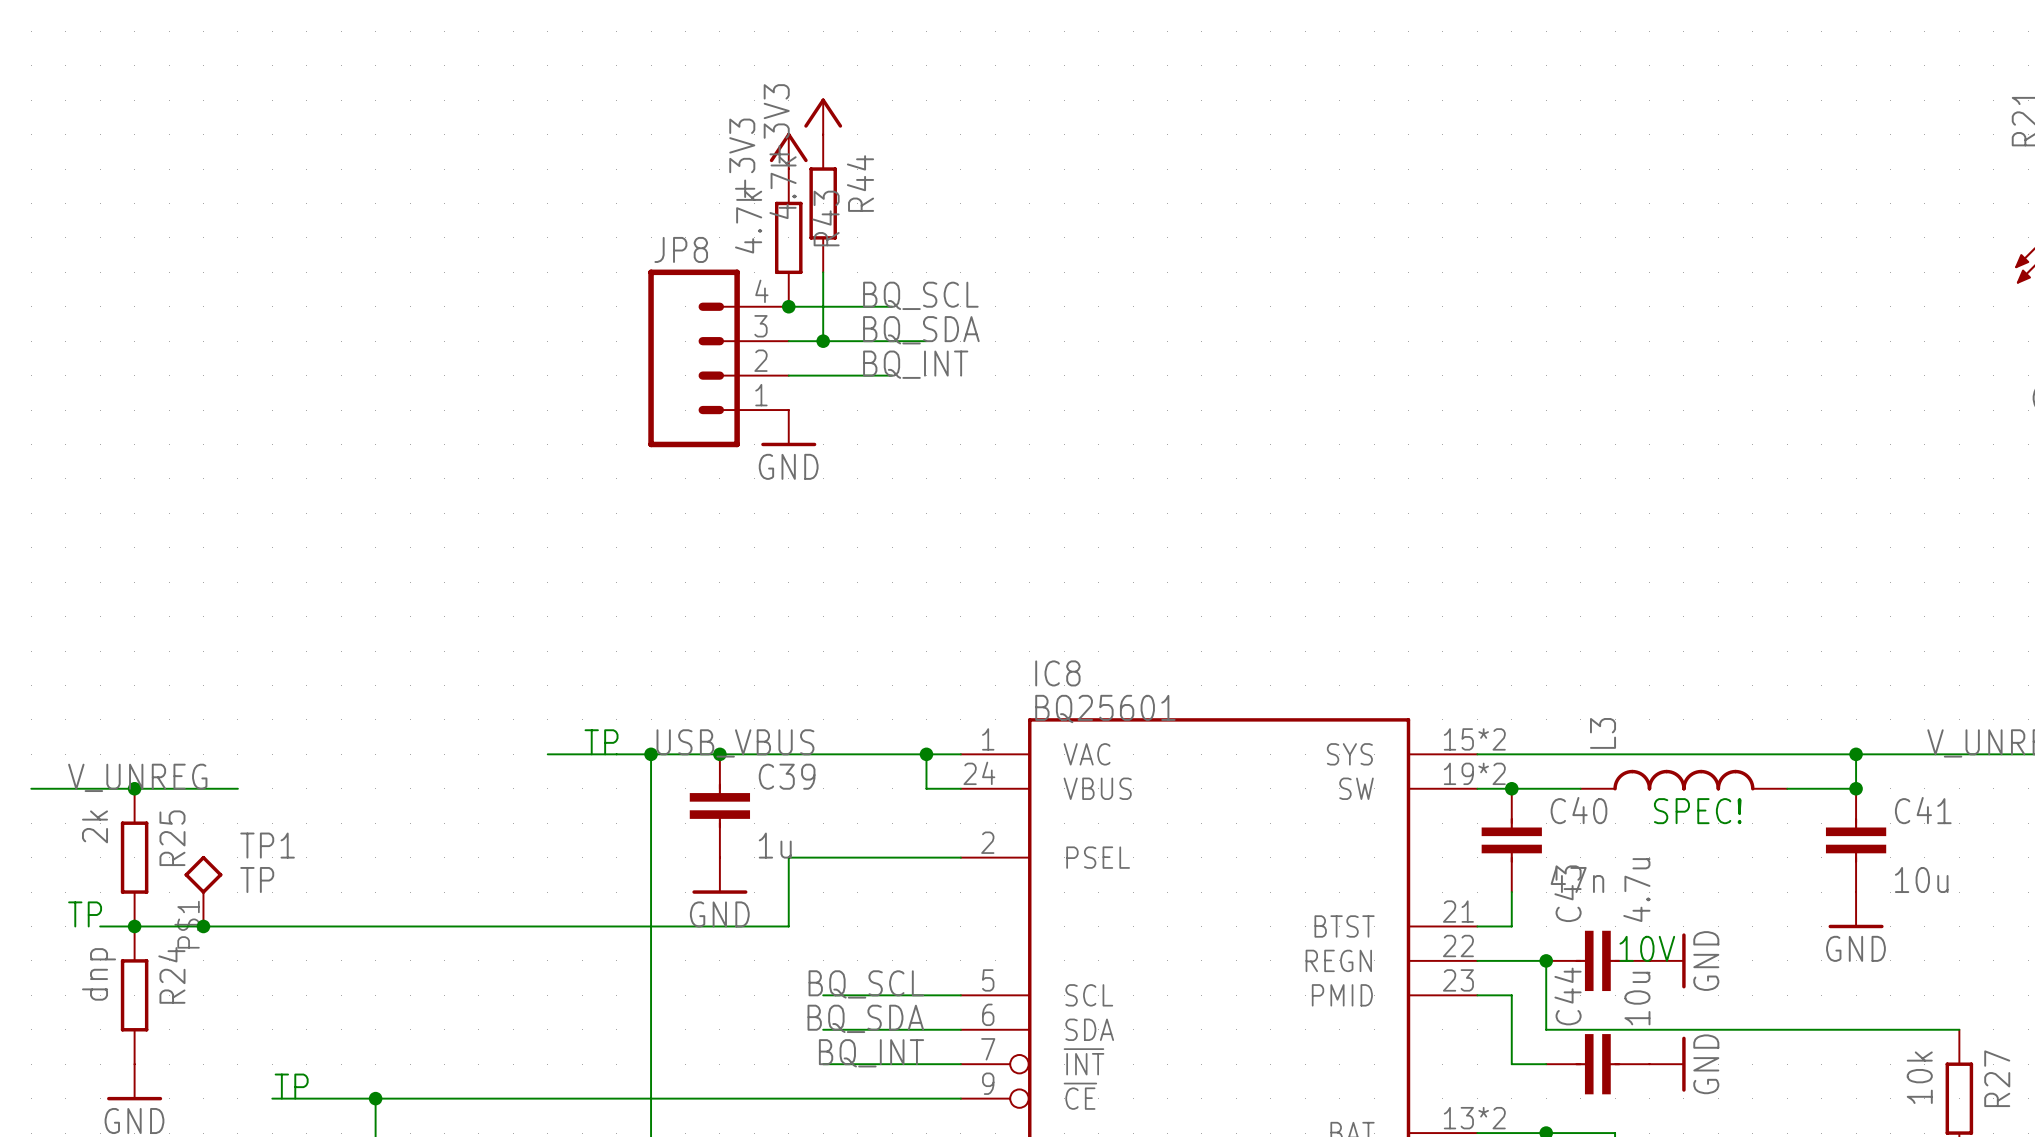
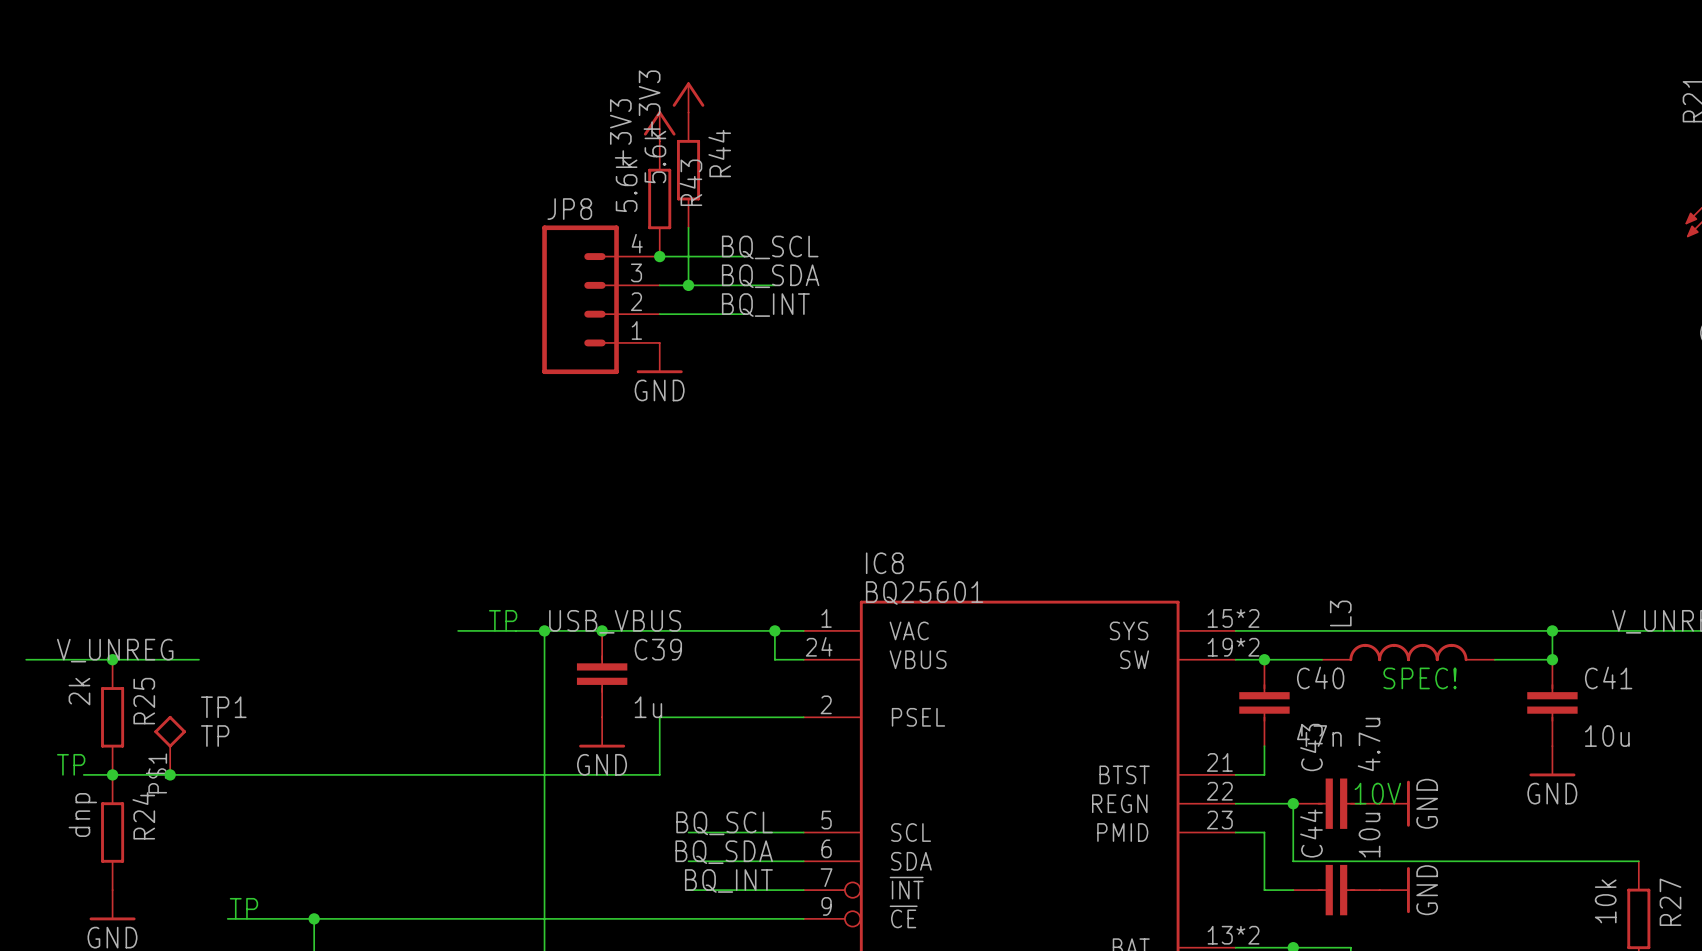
R44 value: 4.7k (783, 187) -> 5.6k (655, 156)
R43 value: 4.7k (748, 222) -> 5.6k (626, 185)

